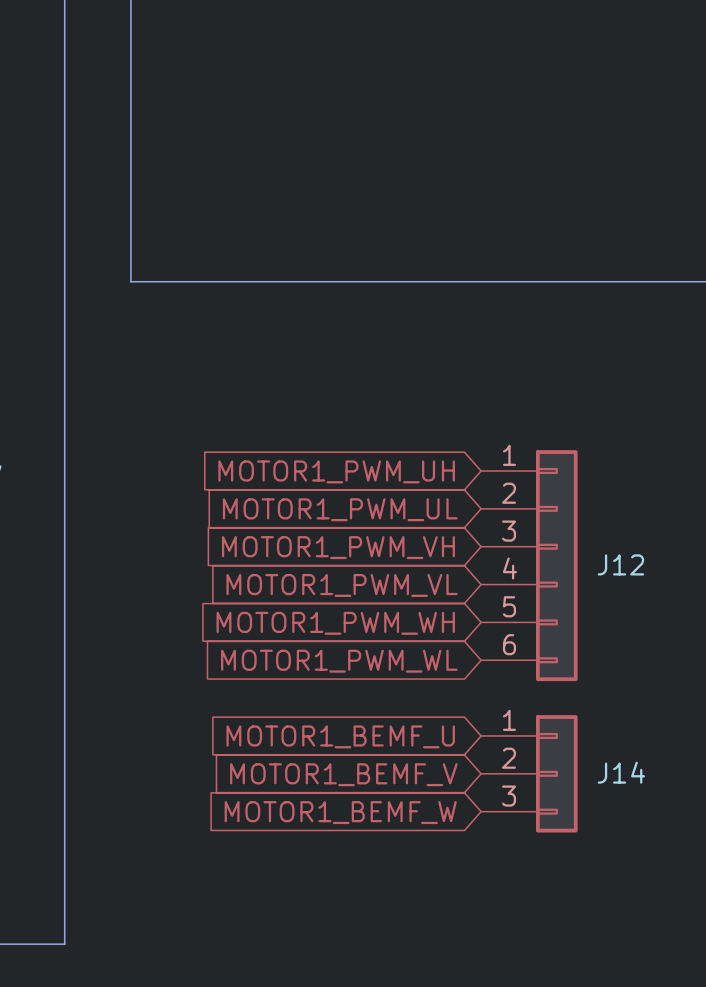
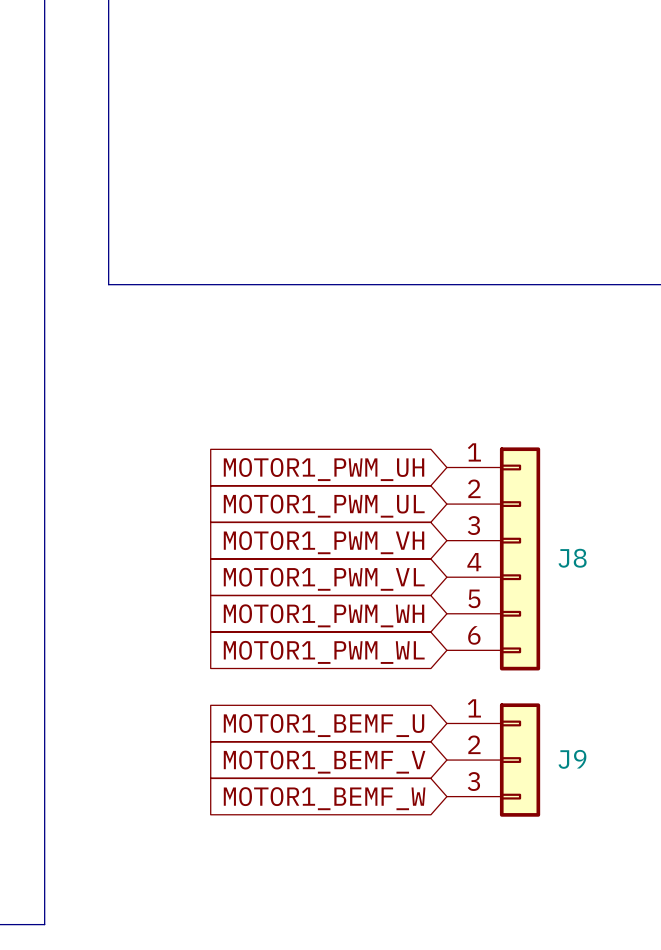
J12 name: J12 (620, 564) -> J8 (572, 558)
J14 name: J14 (621, 772) -> J9 (572, 759)

